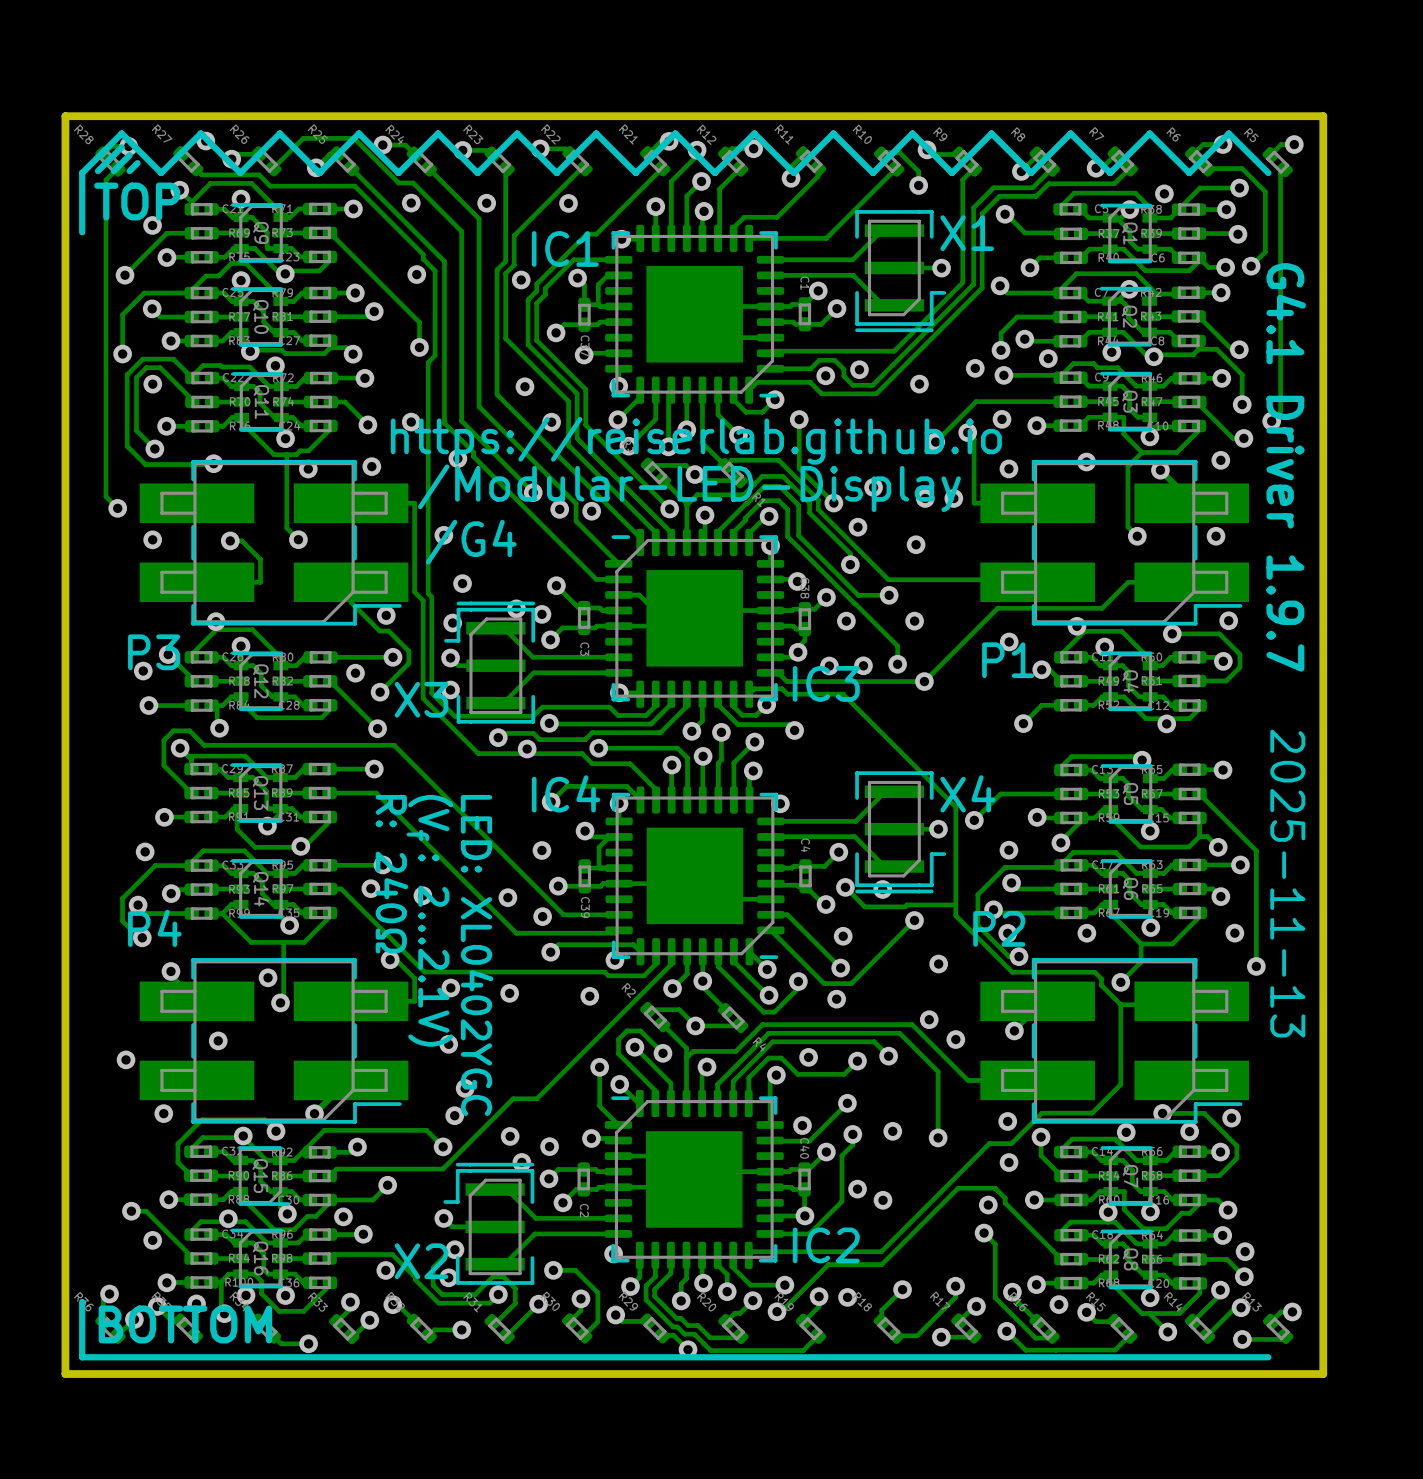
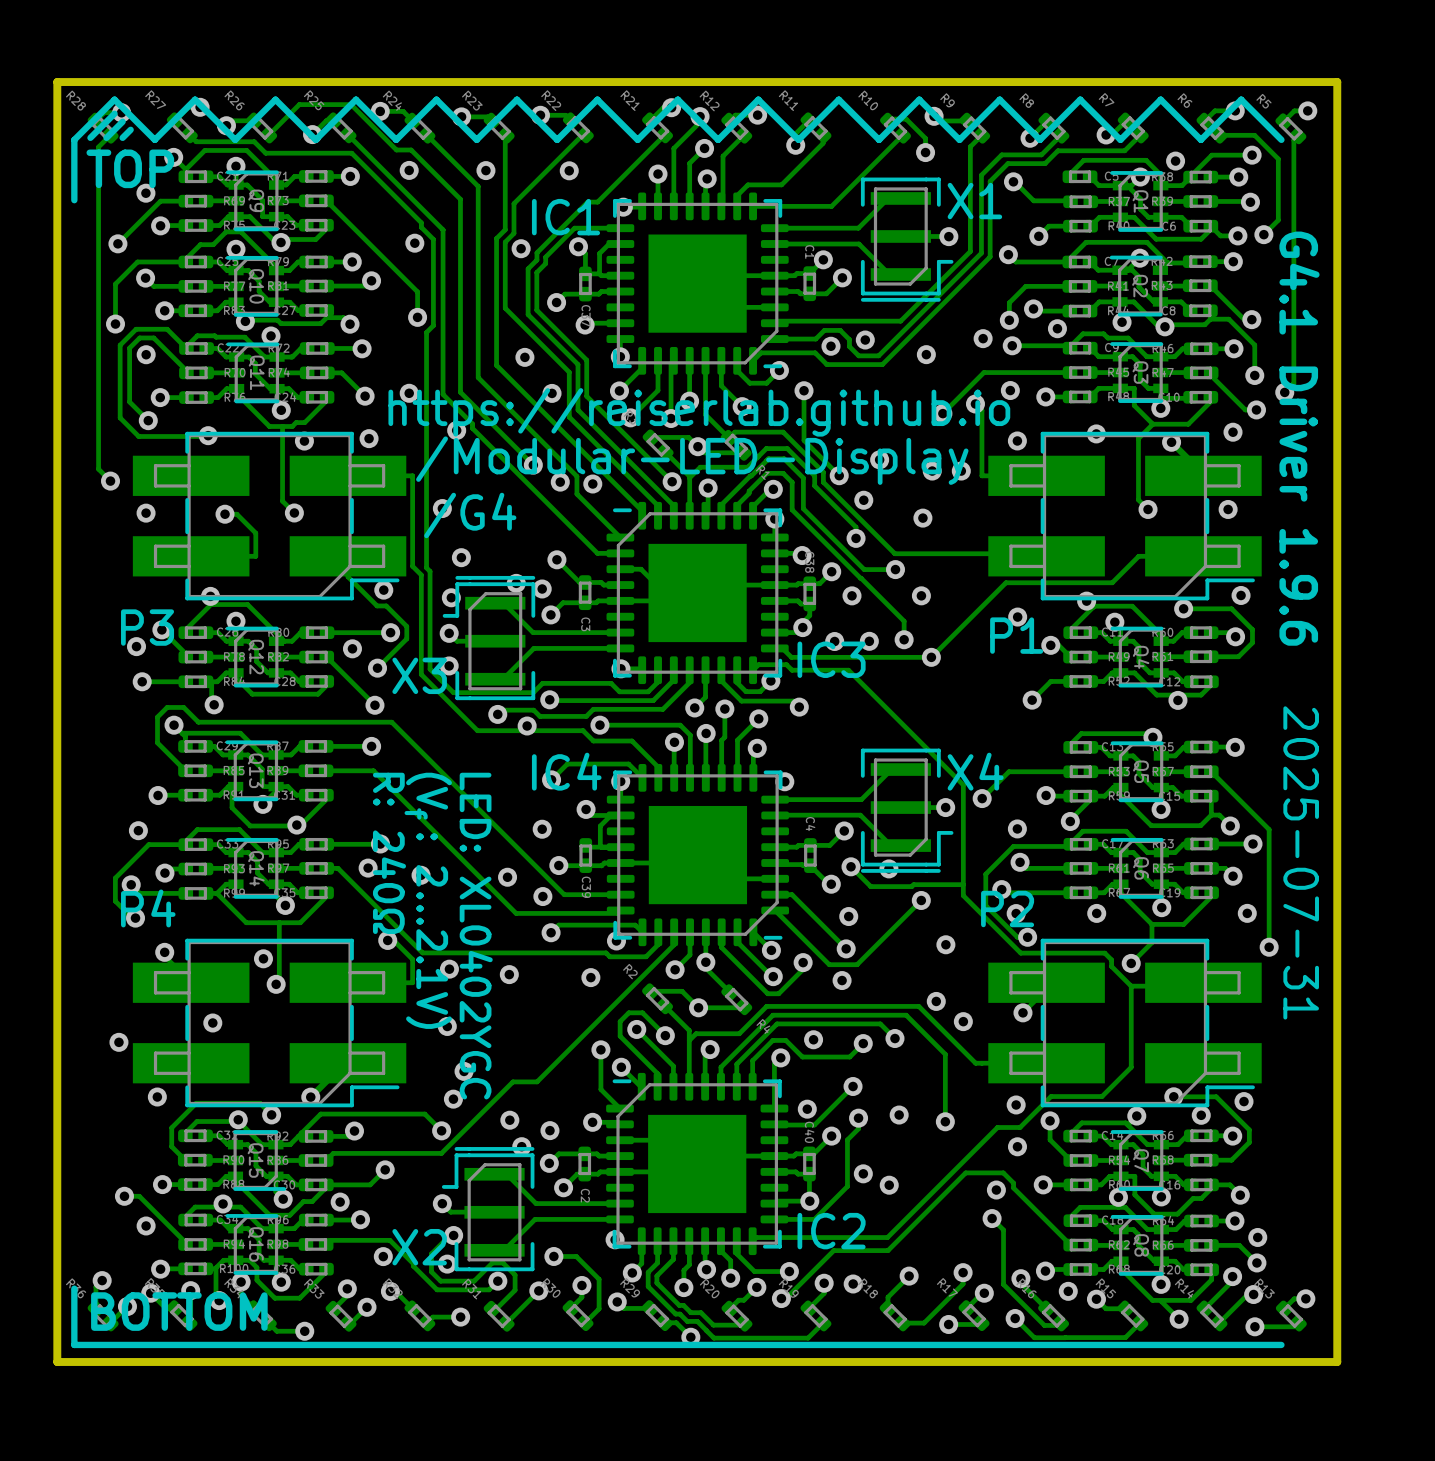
text: G4.1 Driver 1.9.7 (1286, 467) -> G4.1 Driver 1.9.6 (1299, 438)
text: 2025-11-13 (1287, 883) -> 2025-07-31 (1301, 862)

